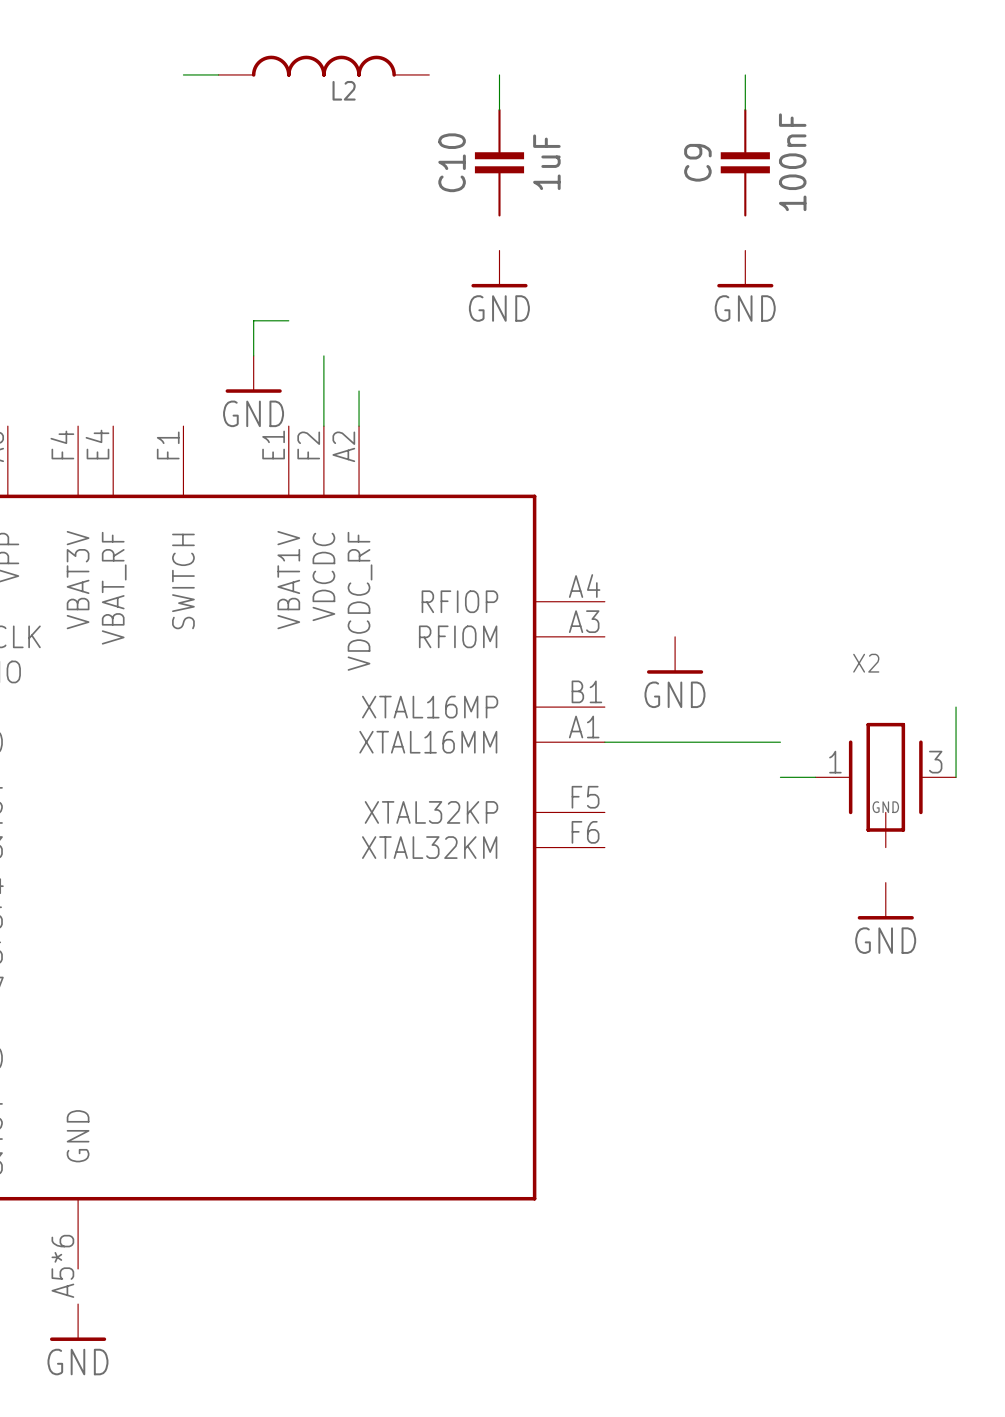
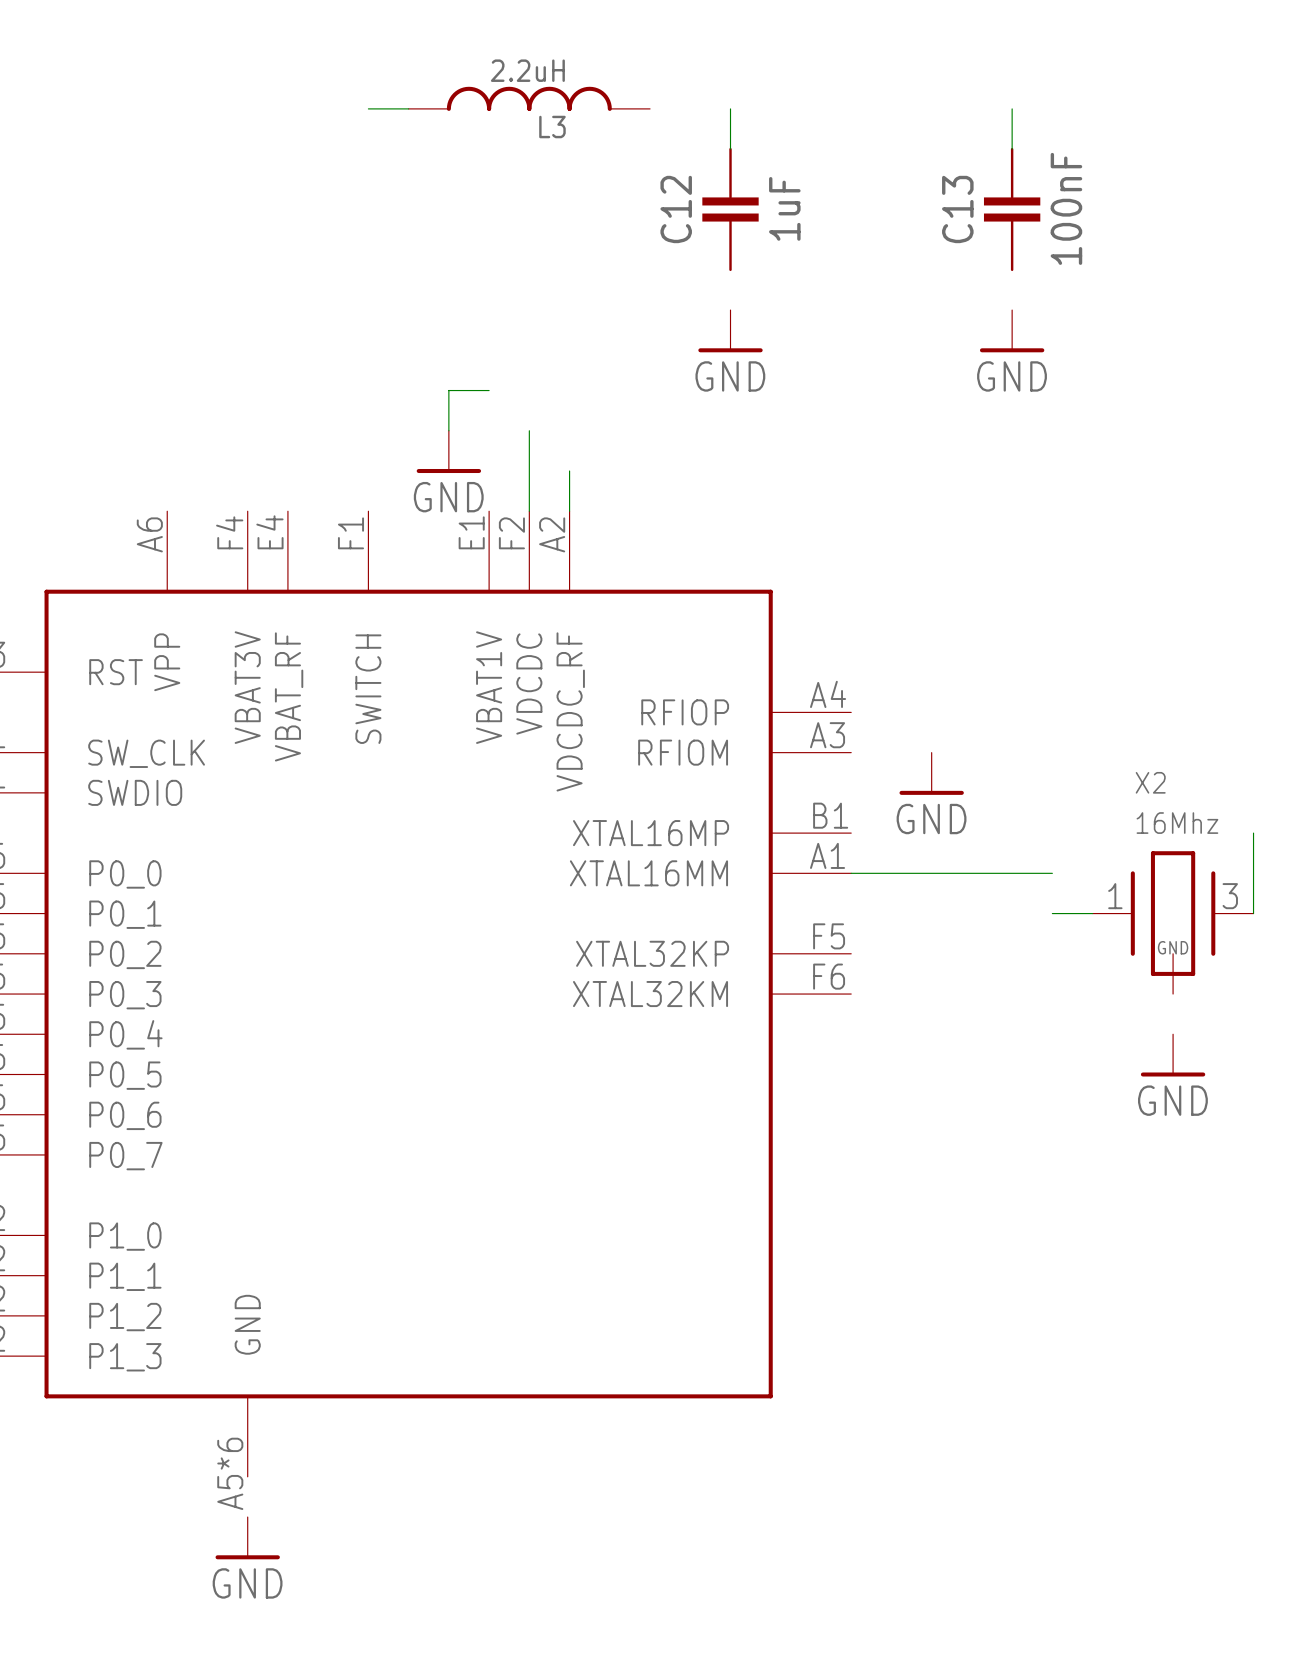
L2 value: none -> 2.2uH (527, 70)
L2 name: L2 (344, 90) -> L3 (552, 127)
C10 name: C10 (452, 162) -> C12 (676, 209)
C9 name: C9 (697, 162) -> C13 (957, 209)
X2 value: none -> 16Mhz (1177, 823)

